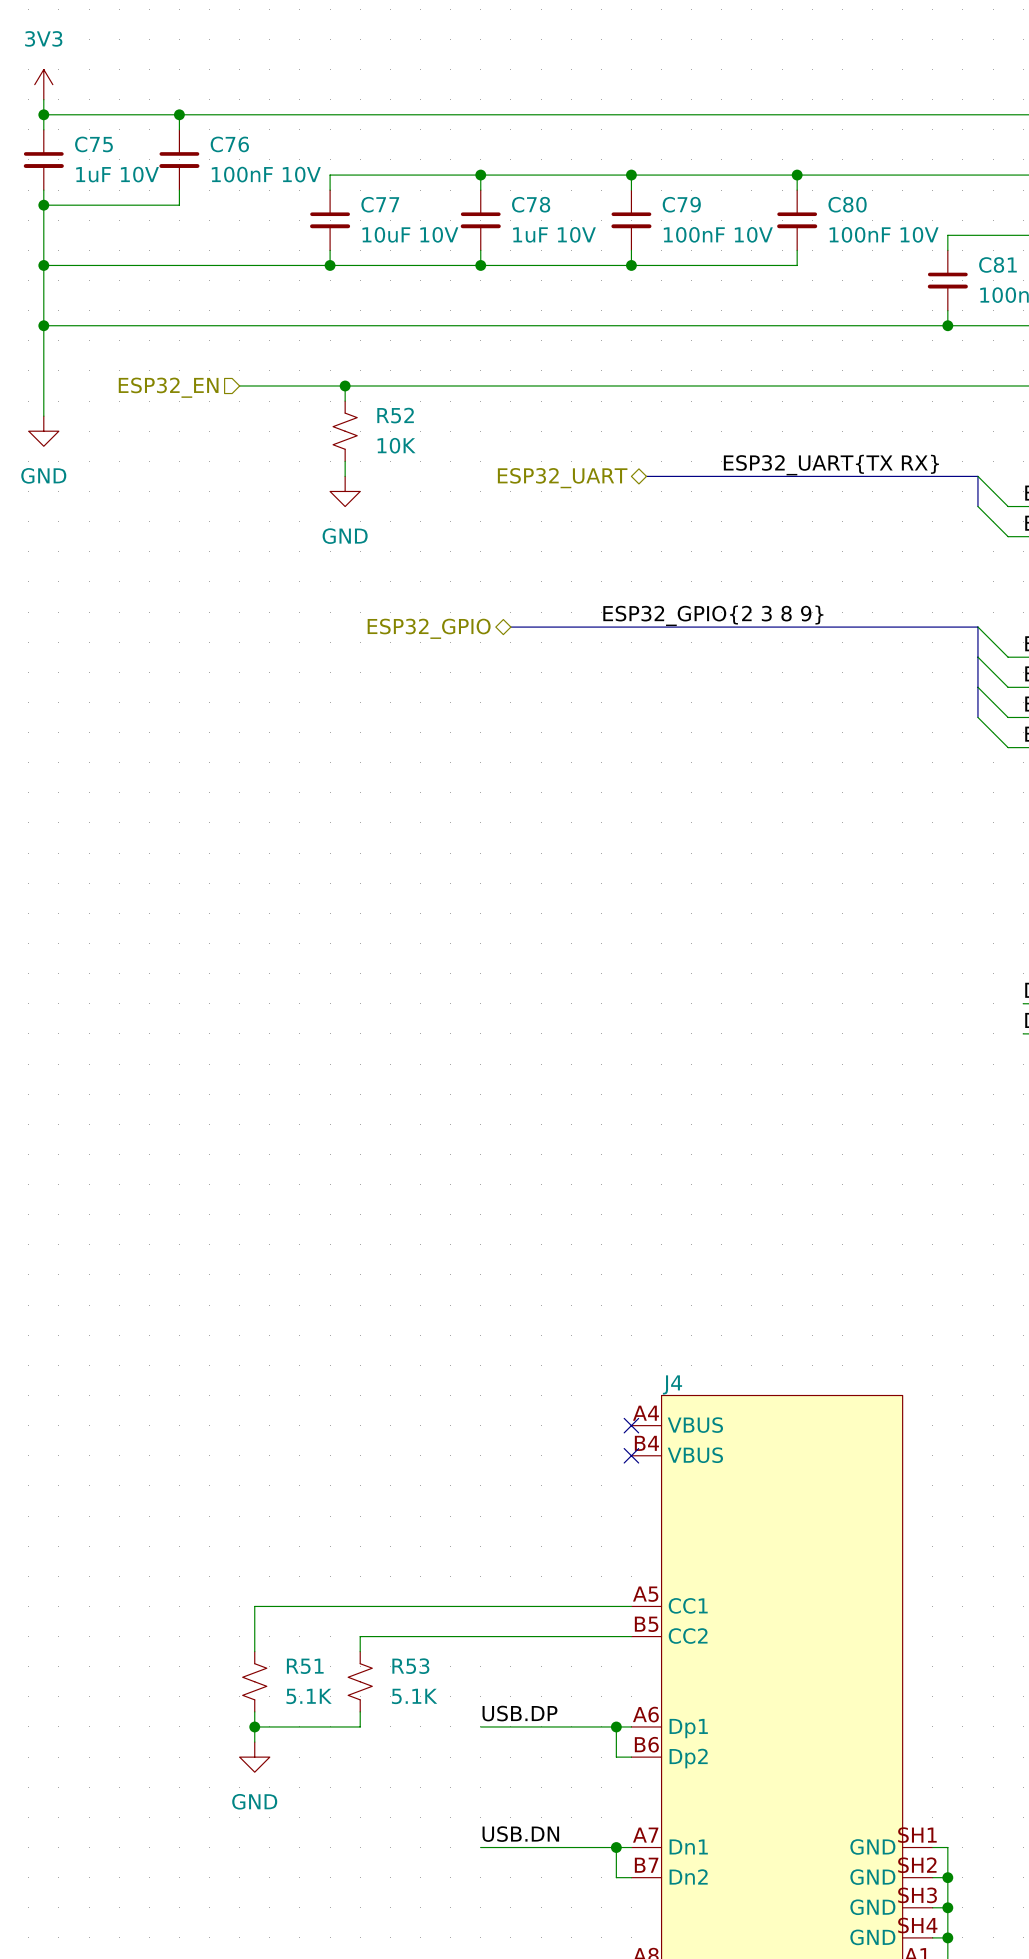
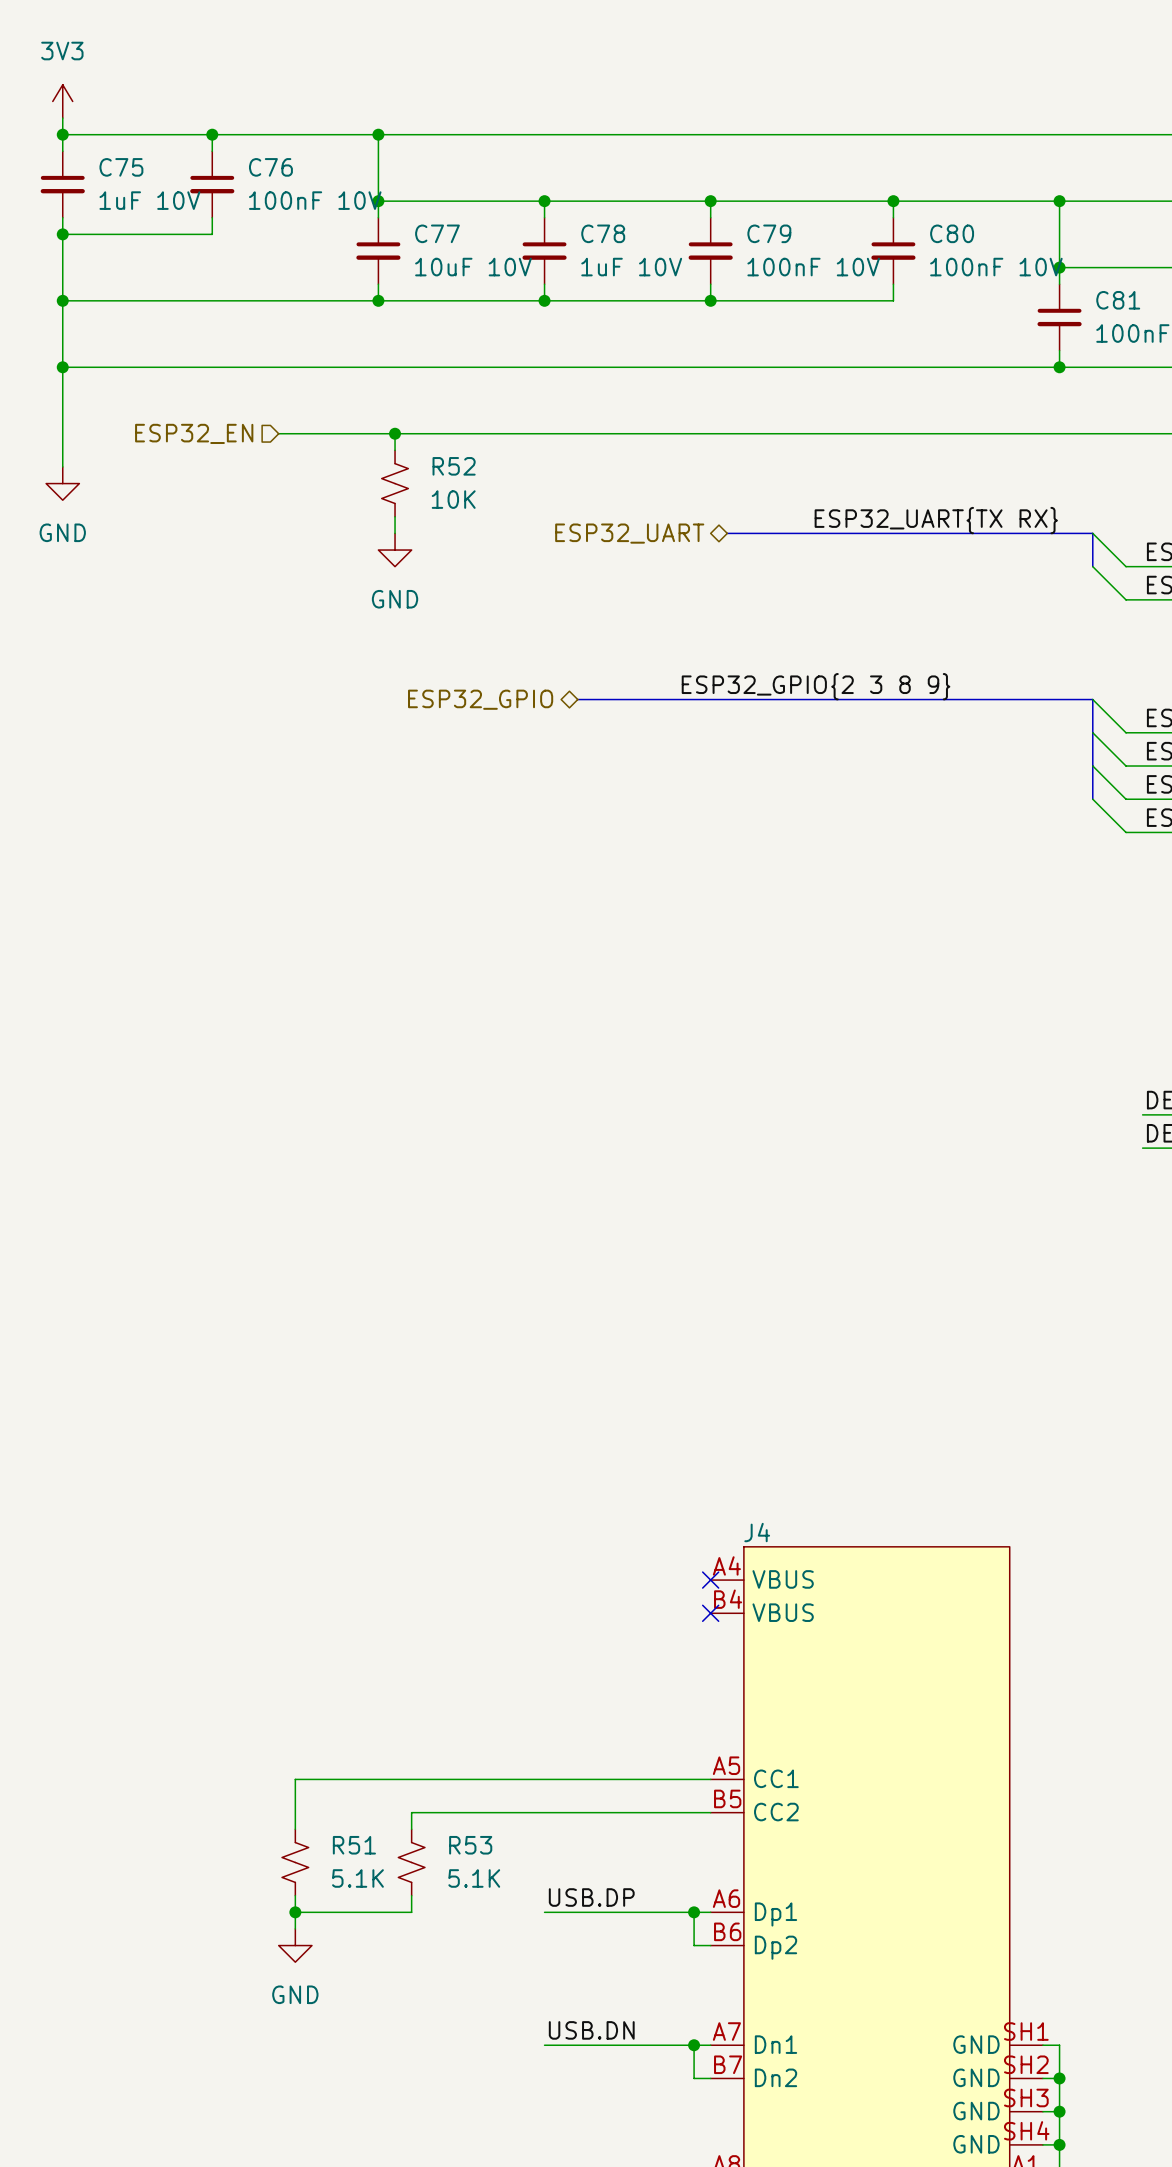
wire: none -> (378, 134) (378, 201)
junction: none -> (378, 134)
junction: none -> (378, 201)
wire: none -> (1059, 201) (1059, 267)
junction: none -> (1059, 201)
junction: none -> (1059, 267)

